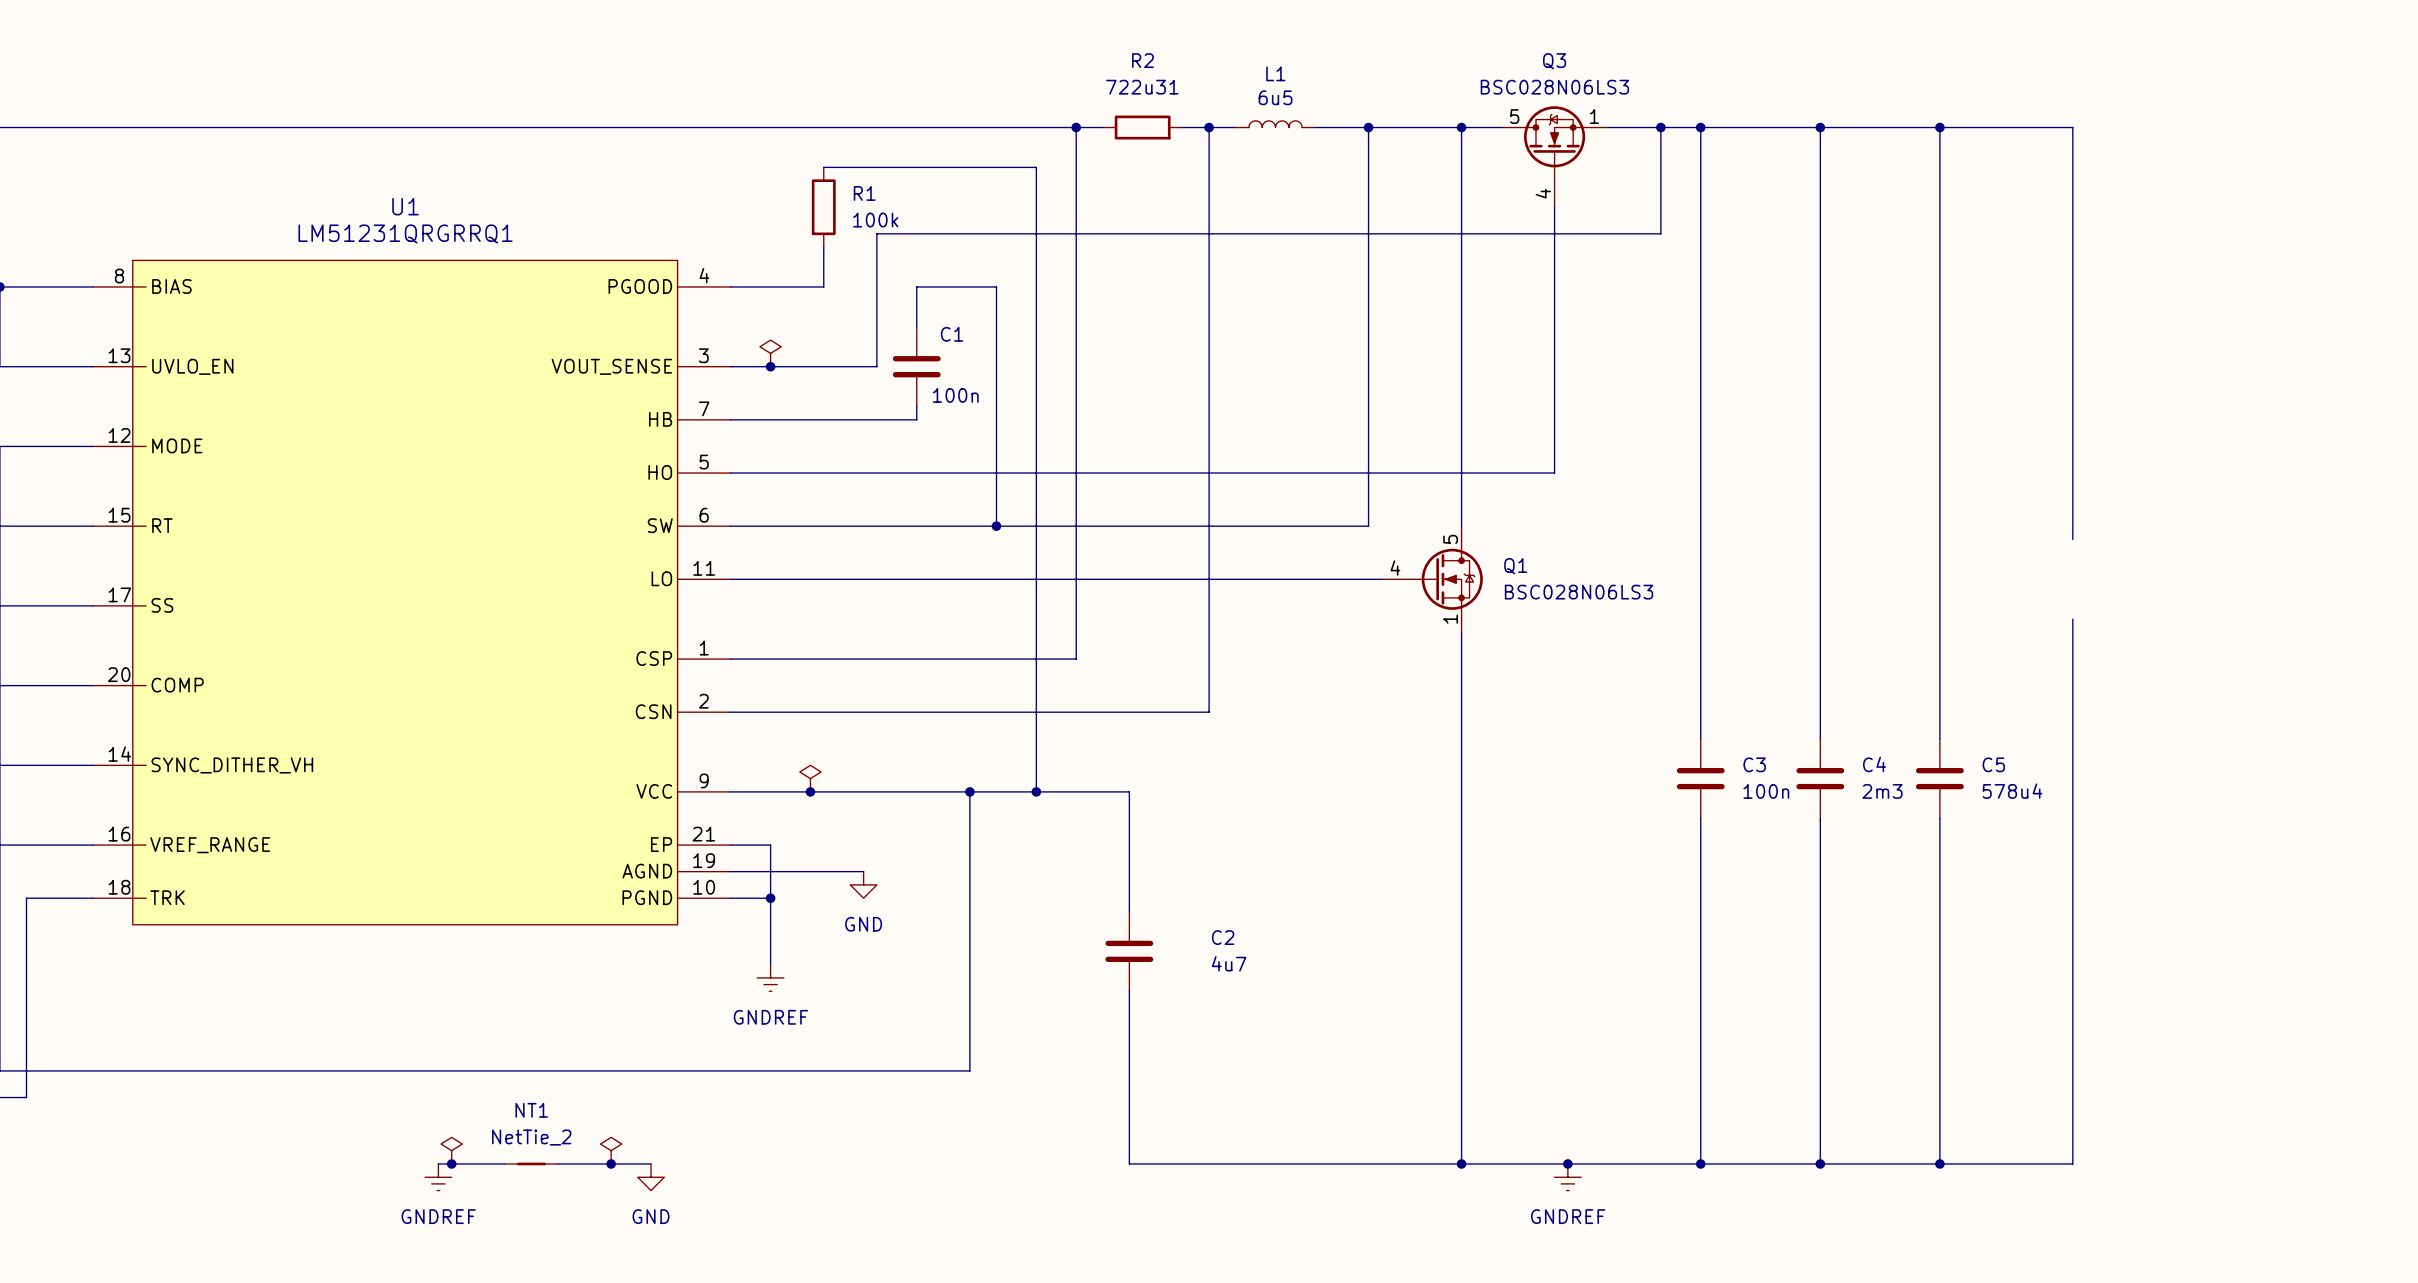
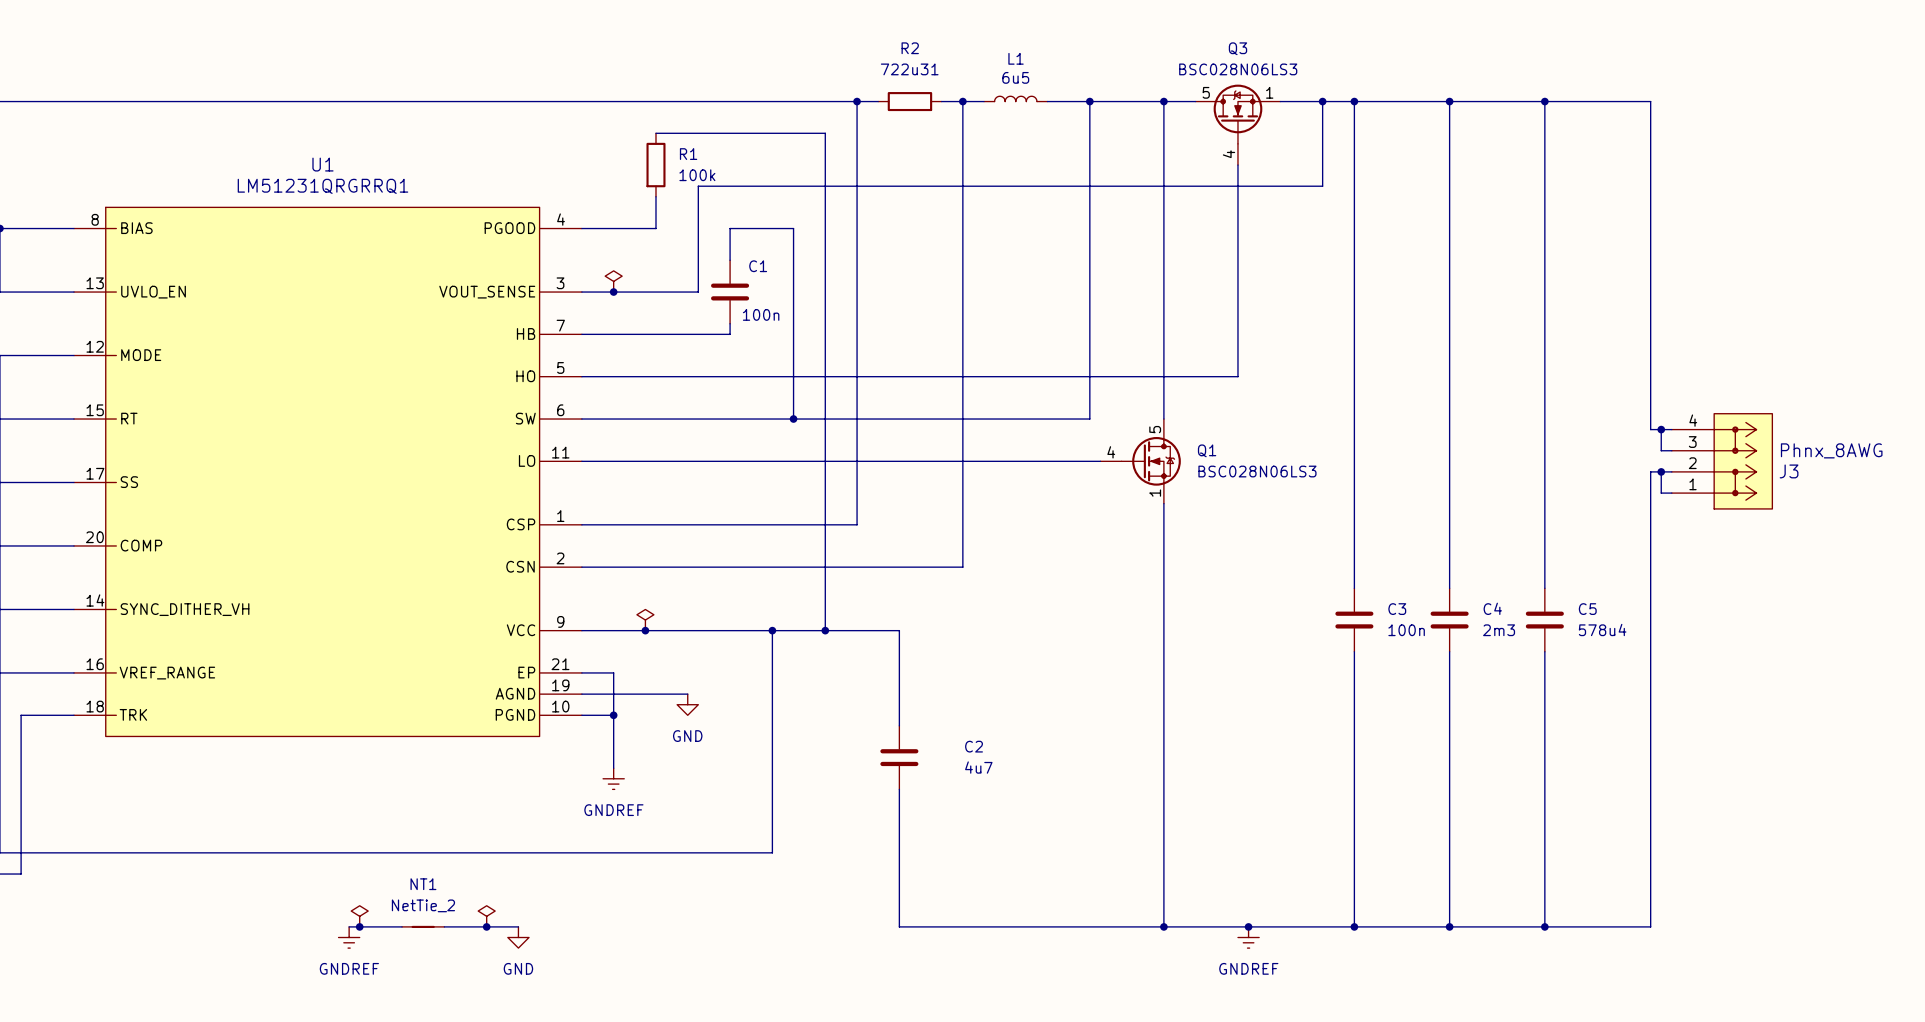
wire: none -> (1650, 429) (1671, 429)
wire: none -> (1661, 429) (1661, 450) (1671, 450)
junction: none -> (1661, 429)
J3: none -> Phnx_8AWG (1722, 461)
wire: none -> (1661, 471) (1661, 493) (1671, 493)
junction: none -> (1661, 471)
wire: none -> (1671, 471) (1650, 471) (1650, 493)

